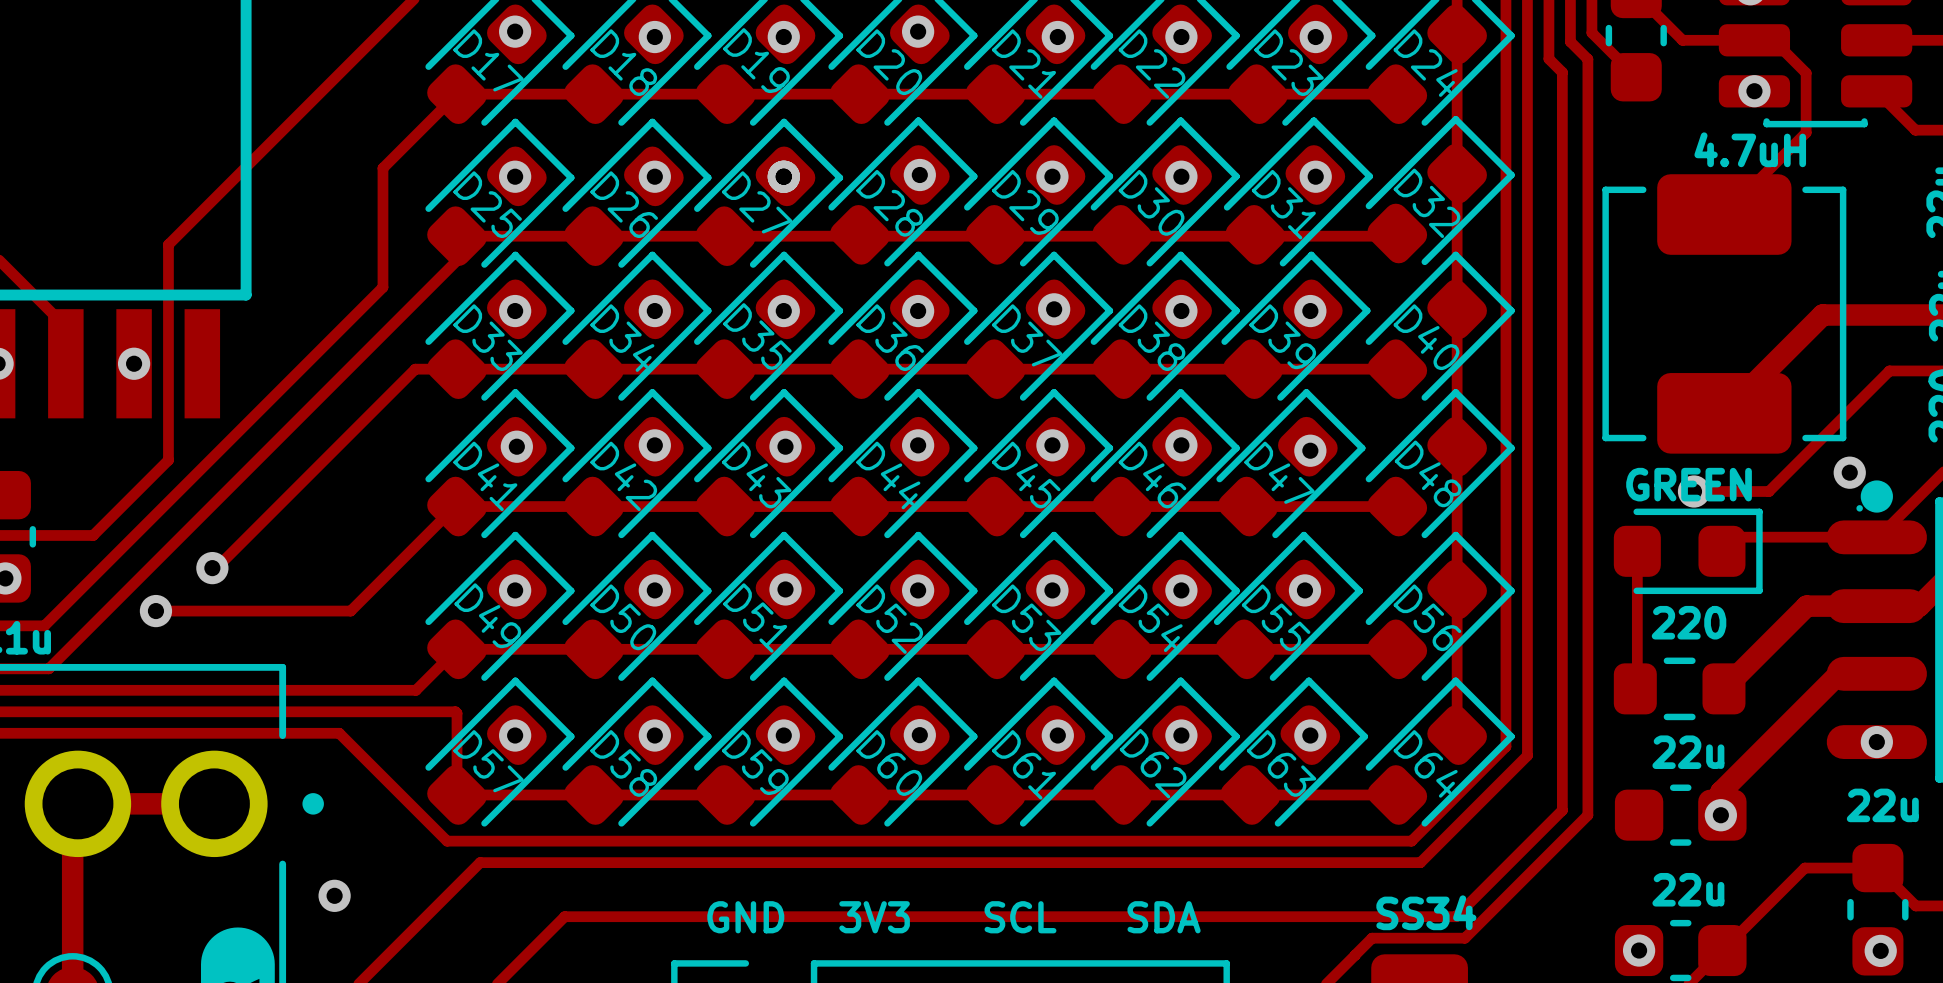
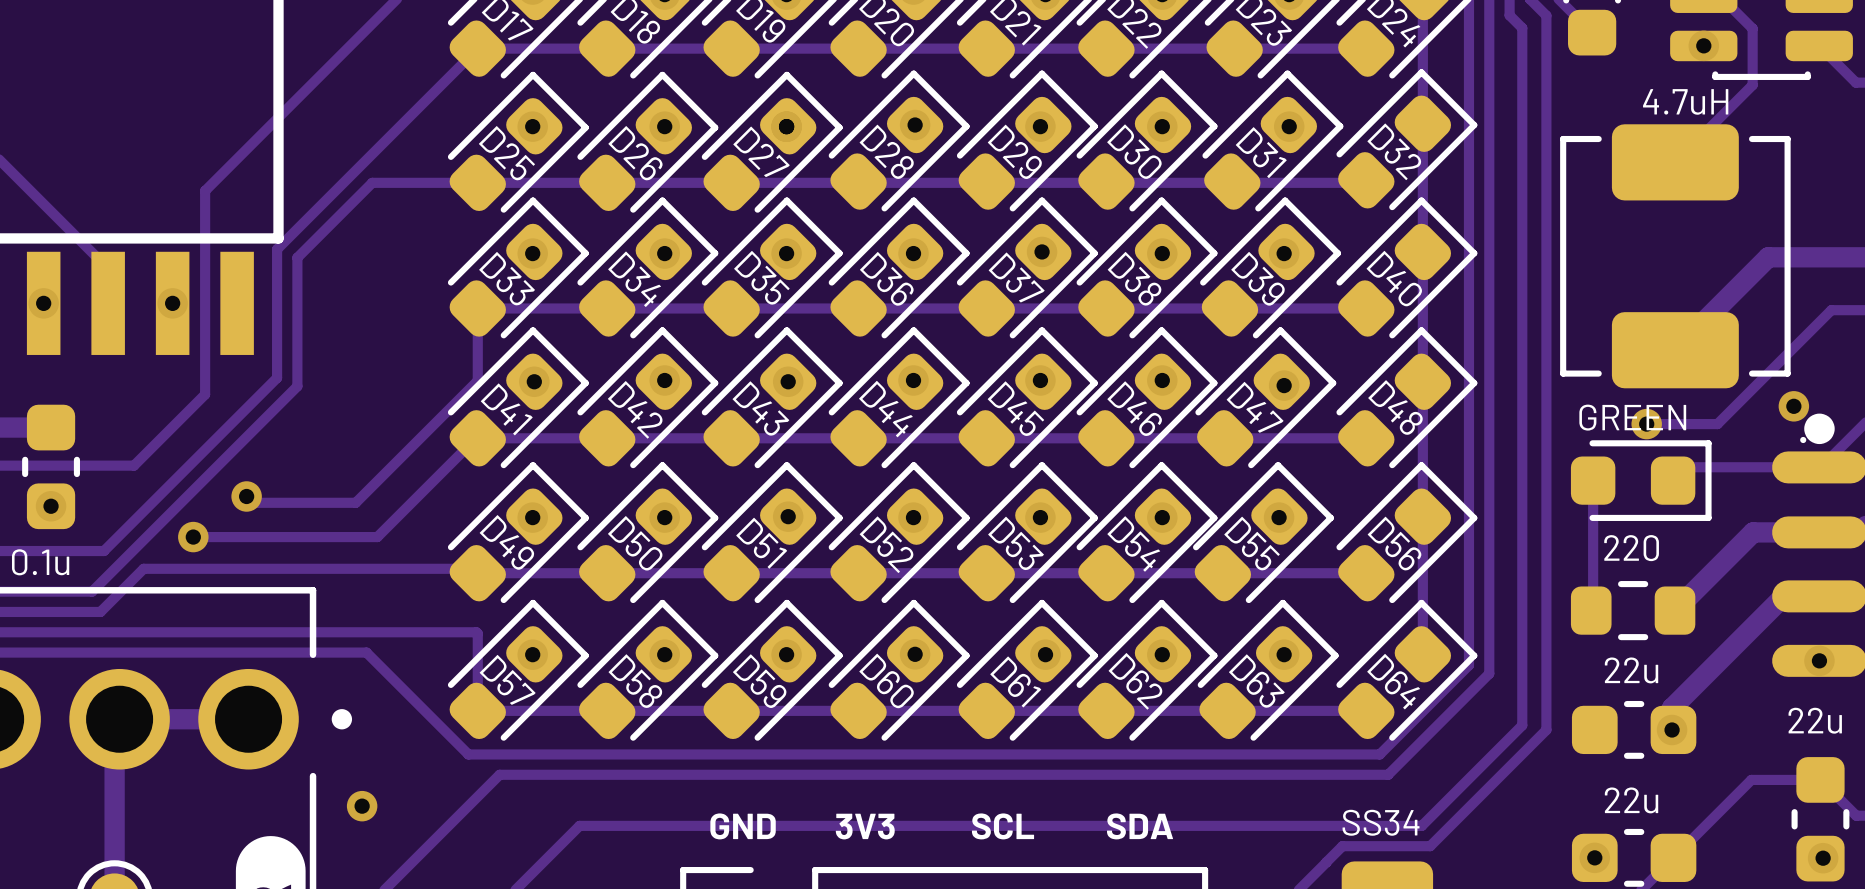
track: (382, 168) (382, 287) (44, 625) -> (407, 118) (277, 249) (277, 377) (103, 551) (87, 551)
track: (457, 236) (457, 260) (266, 451) -> (477, 182) (372, 182) (297, 257) (297, 386)
track: (457, 369) (415, 369) (216, 568) (212, 568) -> (477, 308) (477, 380) (355, 502) (256, 502) (250, 496)
track: (457, 649) (416, 690) (57, 690) -> (477, 573) (473, 568) (143, 568) (100, 611)

